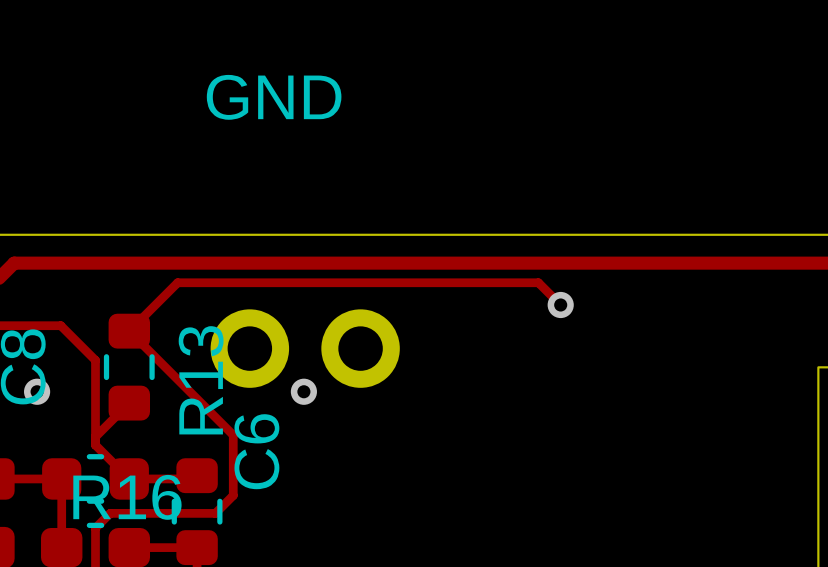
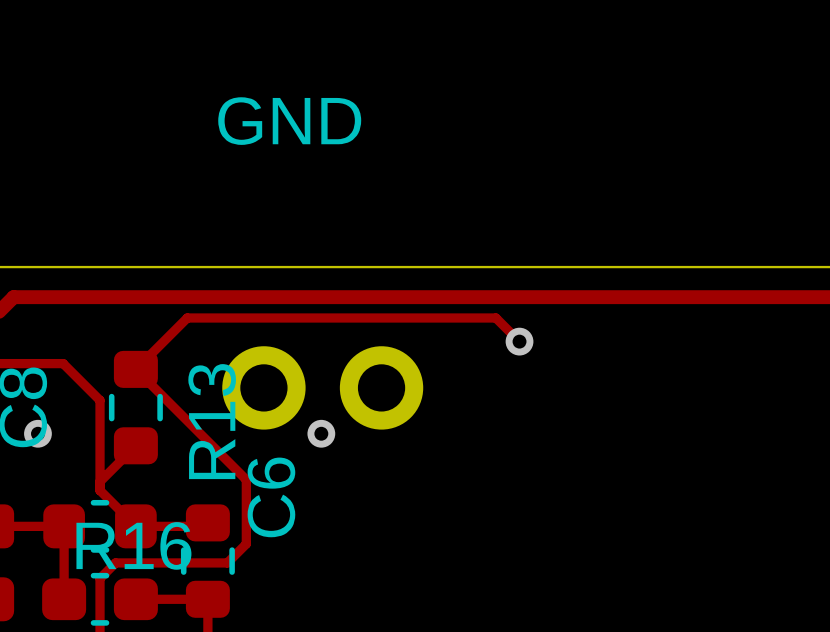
track: (468, 282) (538, 282) (560, 304) -> (495, 317) (519, 341)
via position: (560, 304) -> (519, 341)

